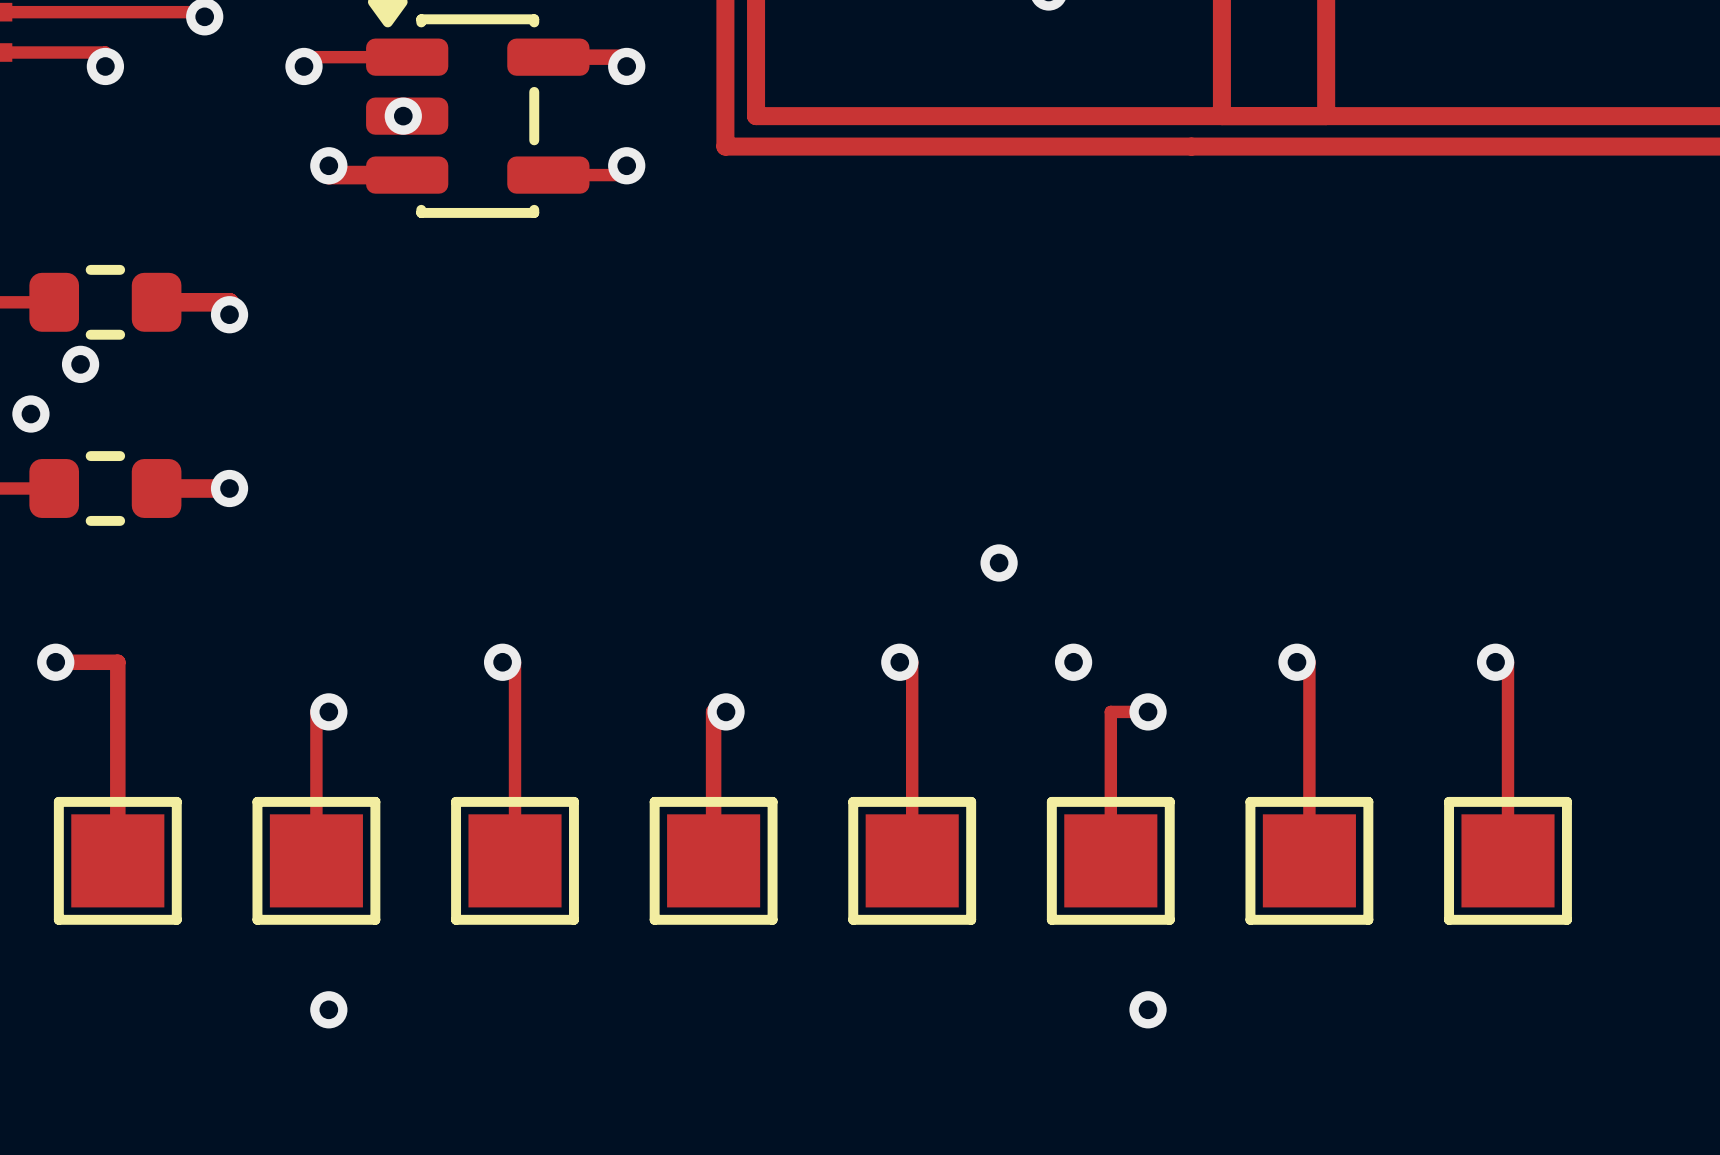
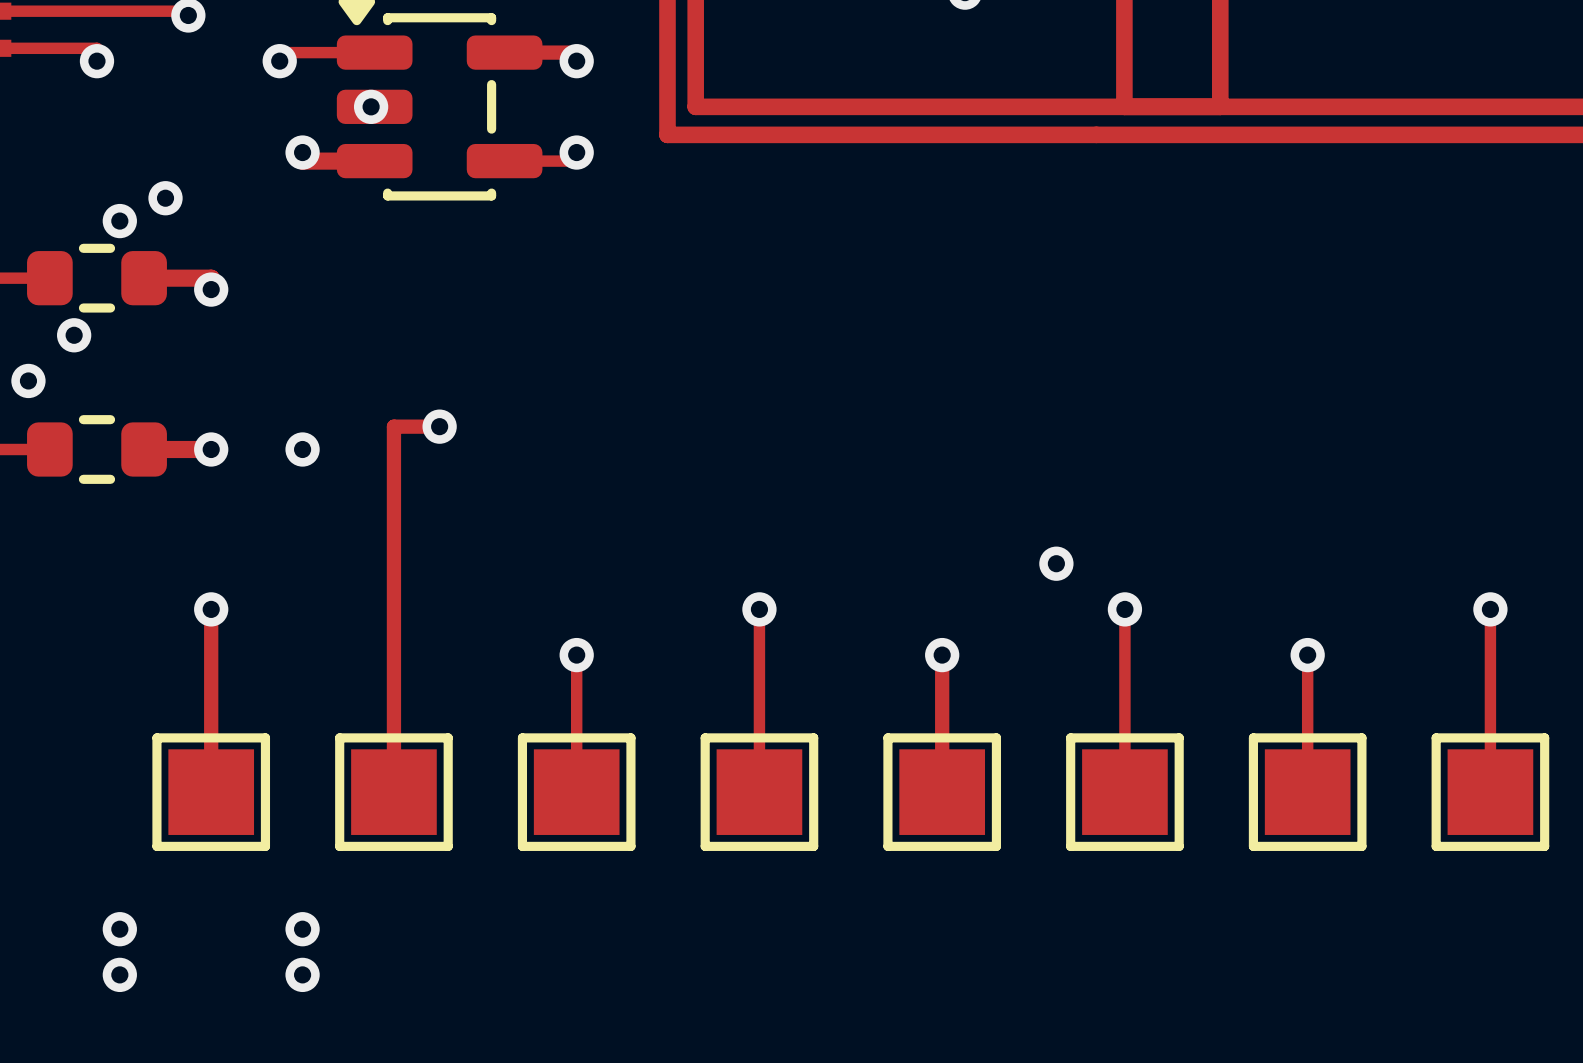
via: none -> (165, 198)
via: none -> (119, 221)
track: none -> (439, 426) (393, 426) (393, 792)
via: none -> (439, 426)
via: none -> (302, 449)
via: (999, 562) -> none
via: none -> (1056, 563)
track: (55, 662) (117, 662) (117, 860) -> none
via: (55, 662) -> none
track: none -> (211, 609) (211, 792)
via: none -> (211, 609)
track: (502, 662) (515, 662) (515, 860) -> none
via: (502, 662) -> none
track: none -> (759, 609) (759, 792)
via: none -> (759, 609)
track: (899, 662) (912, 662) (912, 860) -> none
via: (899, 662) -> none
via: (1073, 662) -> none
track: none -> (1124, 609) (1124, 792)
via: none -> (1124, 609)
track: (1296, 662) (1309, 662) (1309, 860) -> none
via: (1296, 662) -> none
track: (1495, 662) (1508, 662) (1508, 860) -> none
via: (1495, 662) -> none
track: none -> (1490, 609) (1490, 792)
via: none -> (1490, 609)
track: (328, 711) (316, 711) (316, 860) -> none
via: (328, 711) -> none
track: none -> (576, 655) (576, 792)
via: none -> (576, 655)
track: (726, 711) (713, 711) (713, 860) -> none
via: (726, 711) -> none
track: none -> (942, 655) (942, 792)
via: none -> (942, 655)
track: (1148, 711) (1110, 711) (1110, 860) -> none
via: (1148, 711) -> none
track: none -> (1307, 655) (1307, 792)
via: none -> (1307, 655)
part: (117, 860) -> none
part: none -> (211, 792)
part: (316, 860) -> none
part: none -> (393, 792)
part: (515, 860) -> none
part: none -> (576, 792)
part: (713, 860) -> none
part: none -> (759, 792)
part: (912, 860) -> none
part: none -> (942, 792)
part: (1110, 860) -> none
part: none -> (1124, 792)
part: (1309, 860) -> none
part: none -> (1307, 792)
part: (1508, 860) -> none
part: none -> (1490, 792)
via: none -> (119, 929)
via: (1148, 1009) -> none
via: none -> (119, 974)
via: none -> (302, 974)

